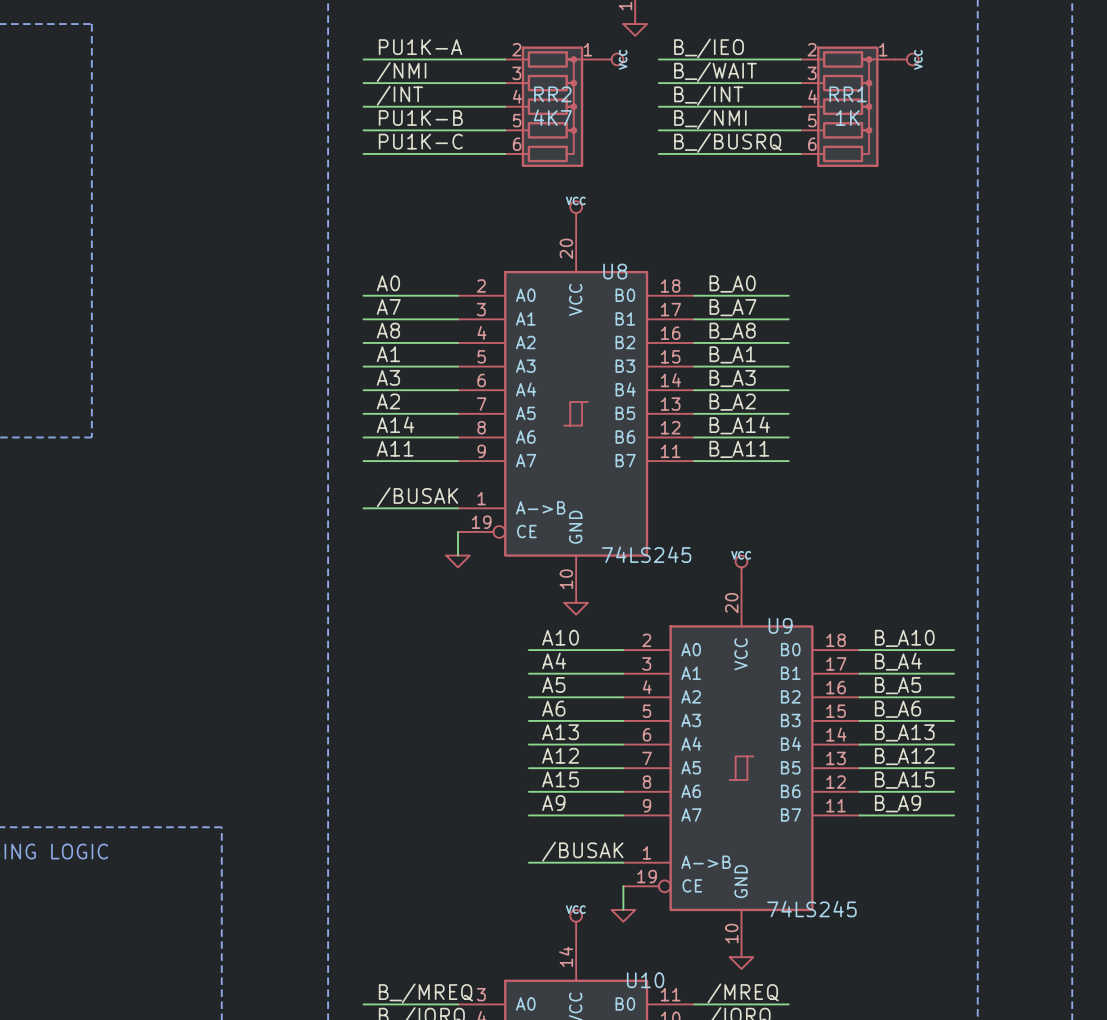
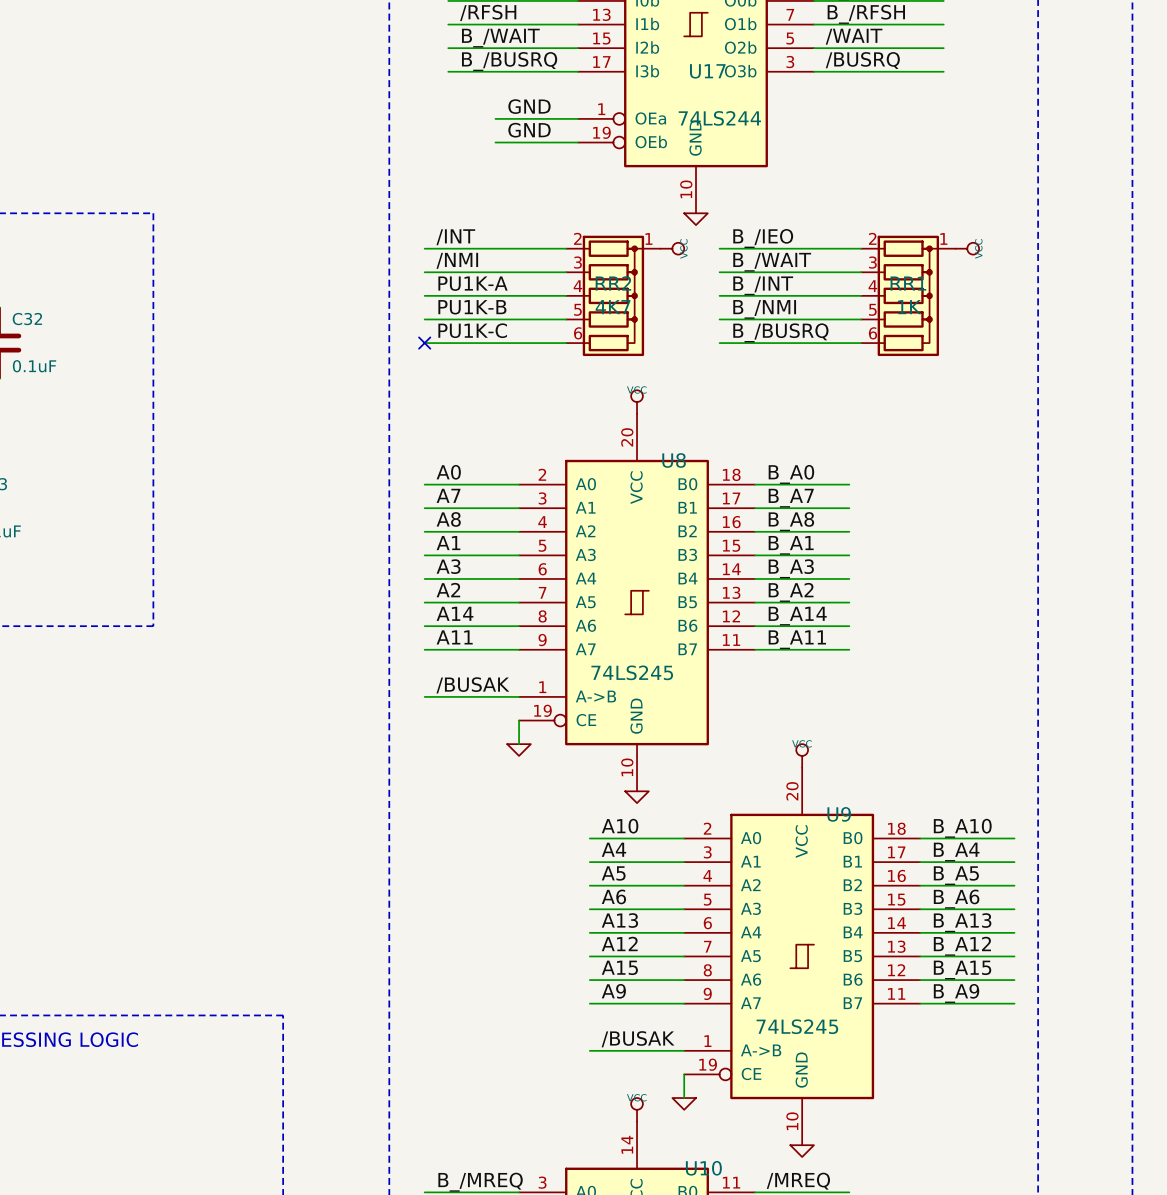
label: PU1K-A (420, 47) -> /INT (455, 237)
label: /INT (399, 95) -> PU1K-A (473, 283)
no-connect mark: none -> (424, 343)
U8 value position: 74LS245 (646, 554) -> 74LS245 (632, 672)
U9 value position: 74LS245 (811, 909) -> 74LS245 (797, 1026)

